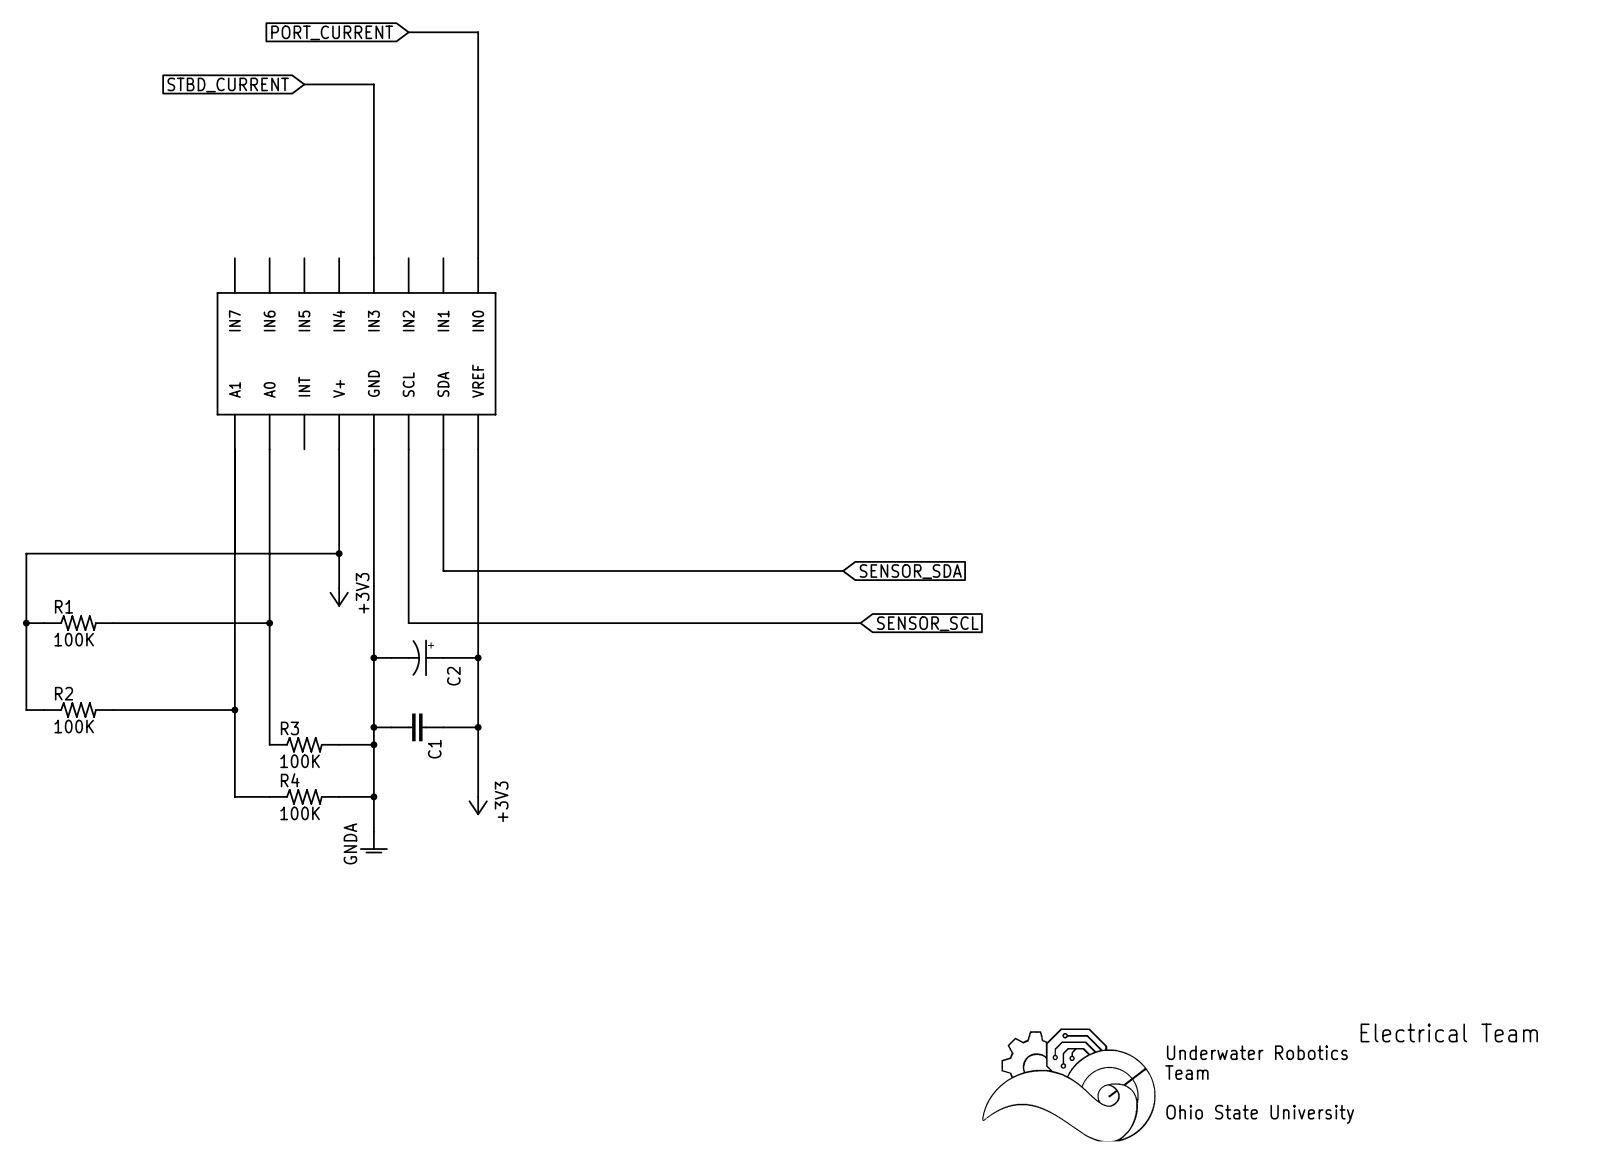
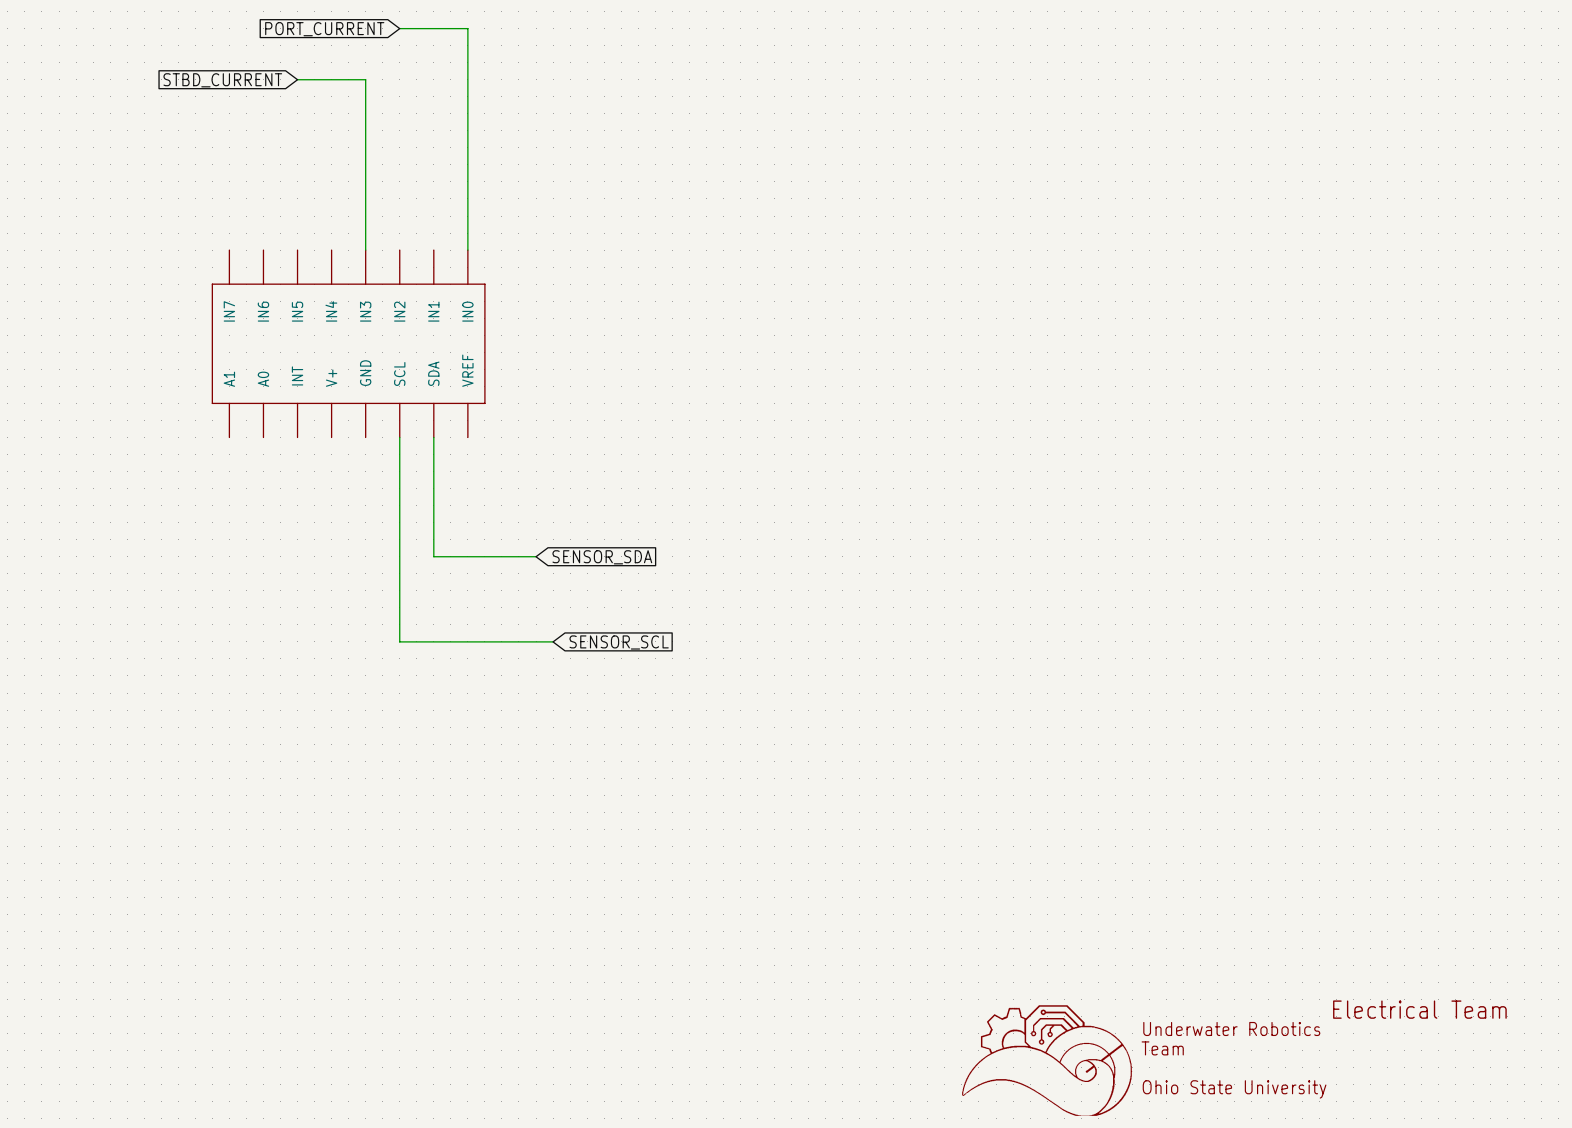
wire: (234, 449) (234, 796) (269, 796) -> none
wire: (269, 449) (269, 744) -> none
wire: (339, 449) (339, 588) -> none
wire: (373, 449) (373, 831) -> none
wire: (478, 449) (478, 796) -> none
wire: (339, 553) (26, 553) (26, 710) (43, 710) -> none
junction: (339, 553) -> none
wire: (547, 571) (843, 571) -> none
global label: none -> SENSOR_SDA (602, 557)
global label: SENSOR_SDA (910, 571) -> none
power symbol: +3V3 (339, 597) -> none
wire: (26, 623) (43, 623) -> none
junction: (26, 623) -> none
R1: 100K (78, 623) -> none
wire: (113, 623) (269, 623) -> none
junction: (269, 623) -> none
wire: (408, 623) (860, 623) -> (399, 607) (399, 641) (433, 641)
global label: SENSOR_SCL (927, 623) -> none
wire: (373, 657) (391, 657) -> none
junction: (373, 657) -> none
C2: (417, 657) -> none
wire: none -> (467, 641) (553, 641)
junction: (478, 657) -> none
global label: none -> SENSOR_SCL (619, 642)
R2: 100K (78, 710) -> none
wire: (113, 710) (234, 710) -> none
junction: (234, 710) -> none
wire: (373, 727) (391, 727) -> none
junction: (373, 727) -> none
C1: (417, 727) -> none
wire: (443, 727) (478, 727) -> none
junction: (478, 727) -> none
R3: 100K (304, 744) -> none
wire: (339, 744) (373, 744) -> none
junction: (373, 744) -> none
R4: 100K (304, 796) -> none
wire: (339, 796) (373, 796) -> none
junction: (373, 796) -> none
power symbol: +3V3 (478, 806) -> none
power symbol: GNDA (373, 842) -> none

